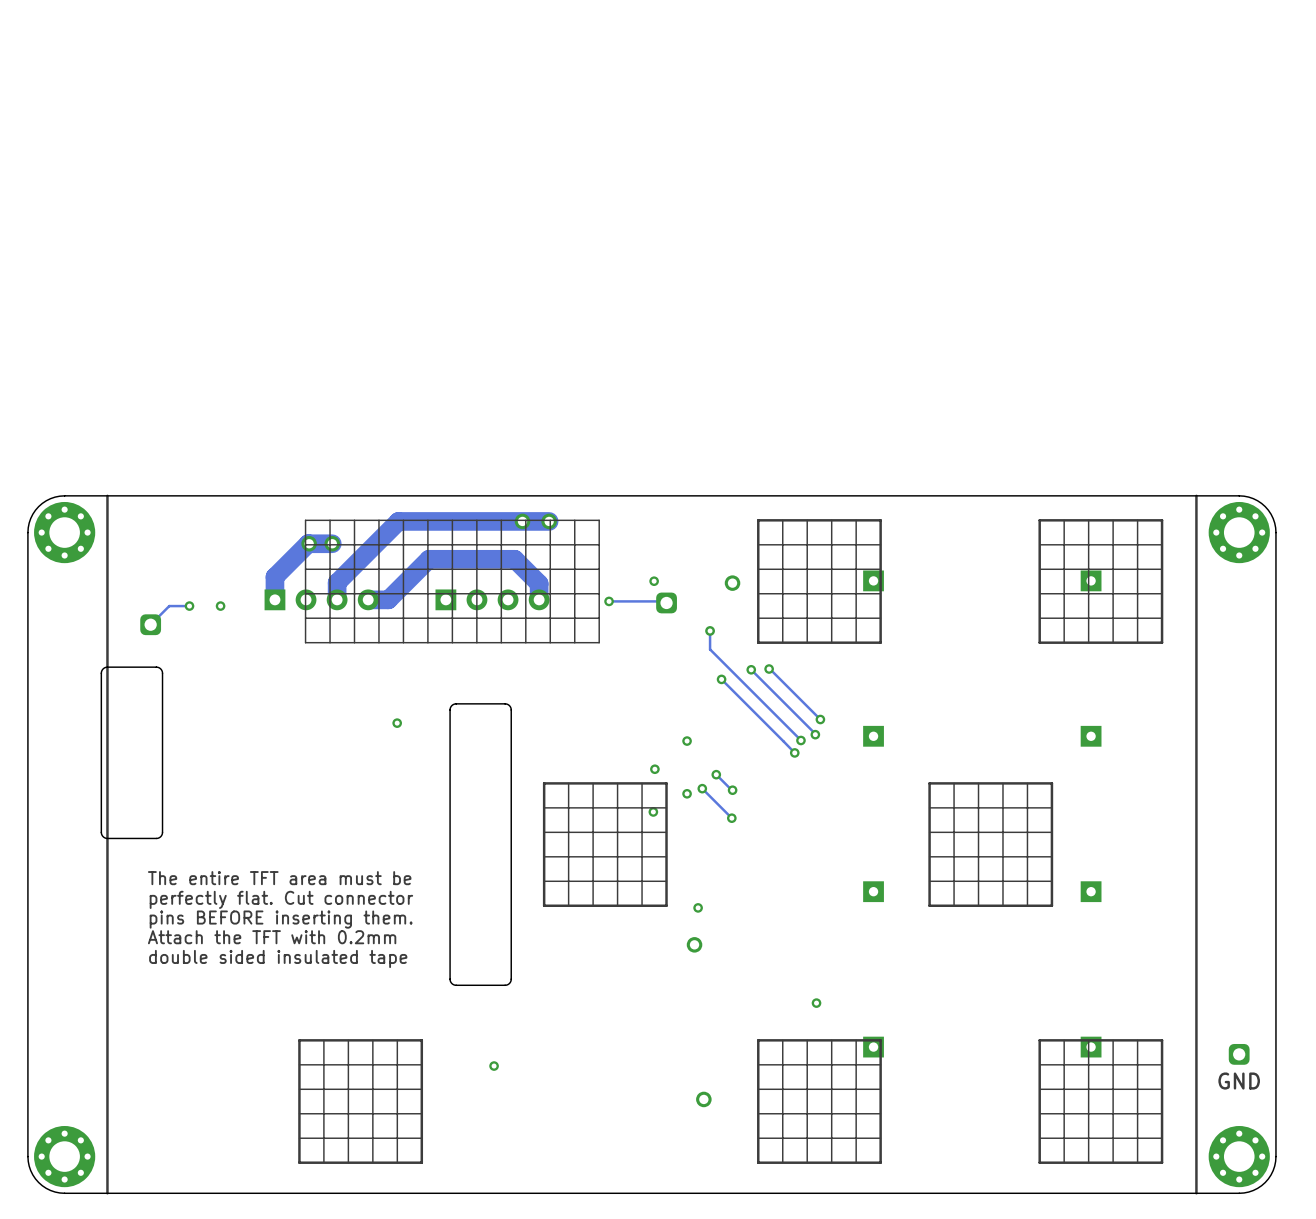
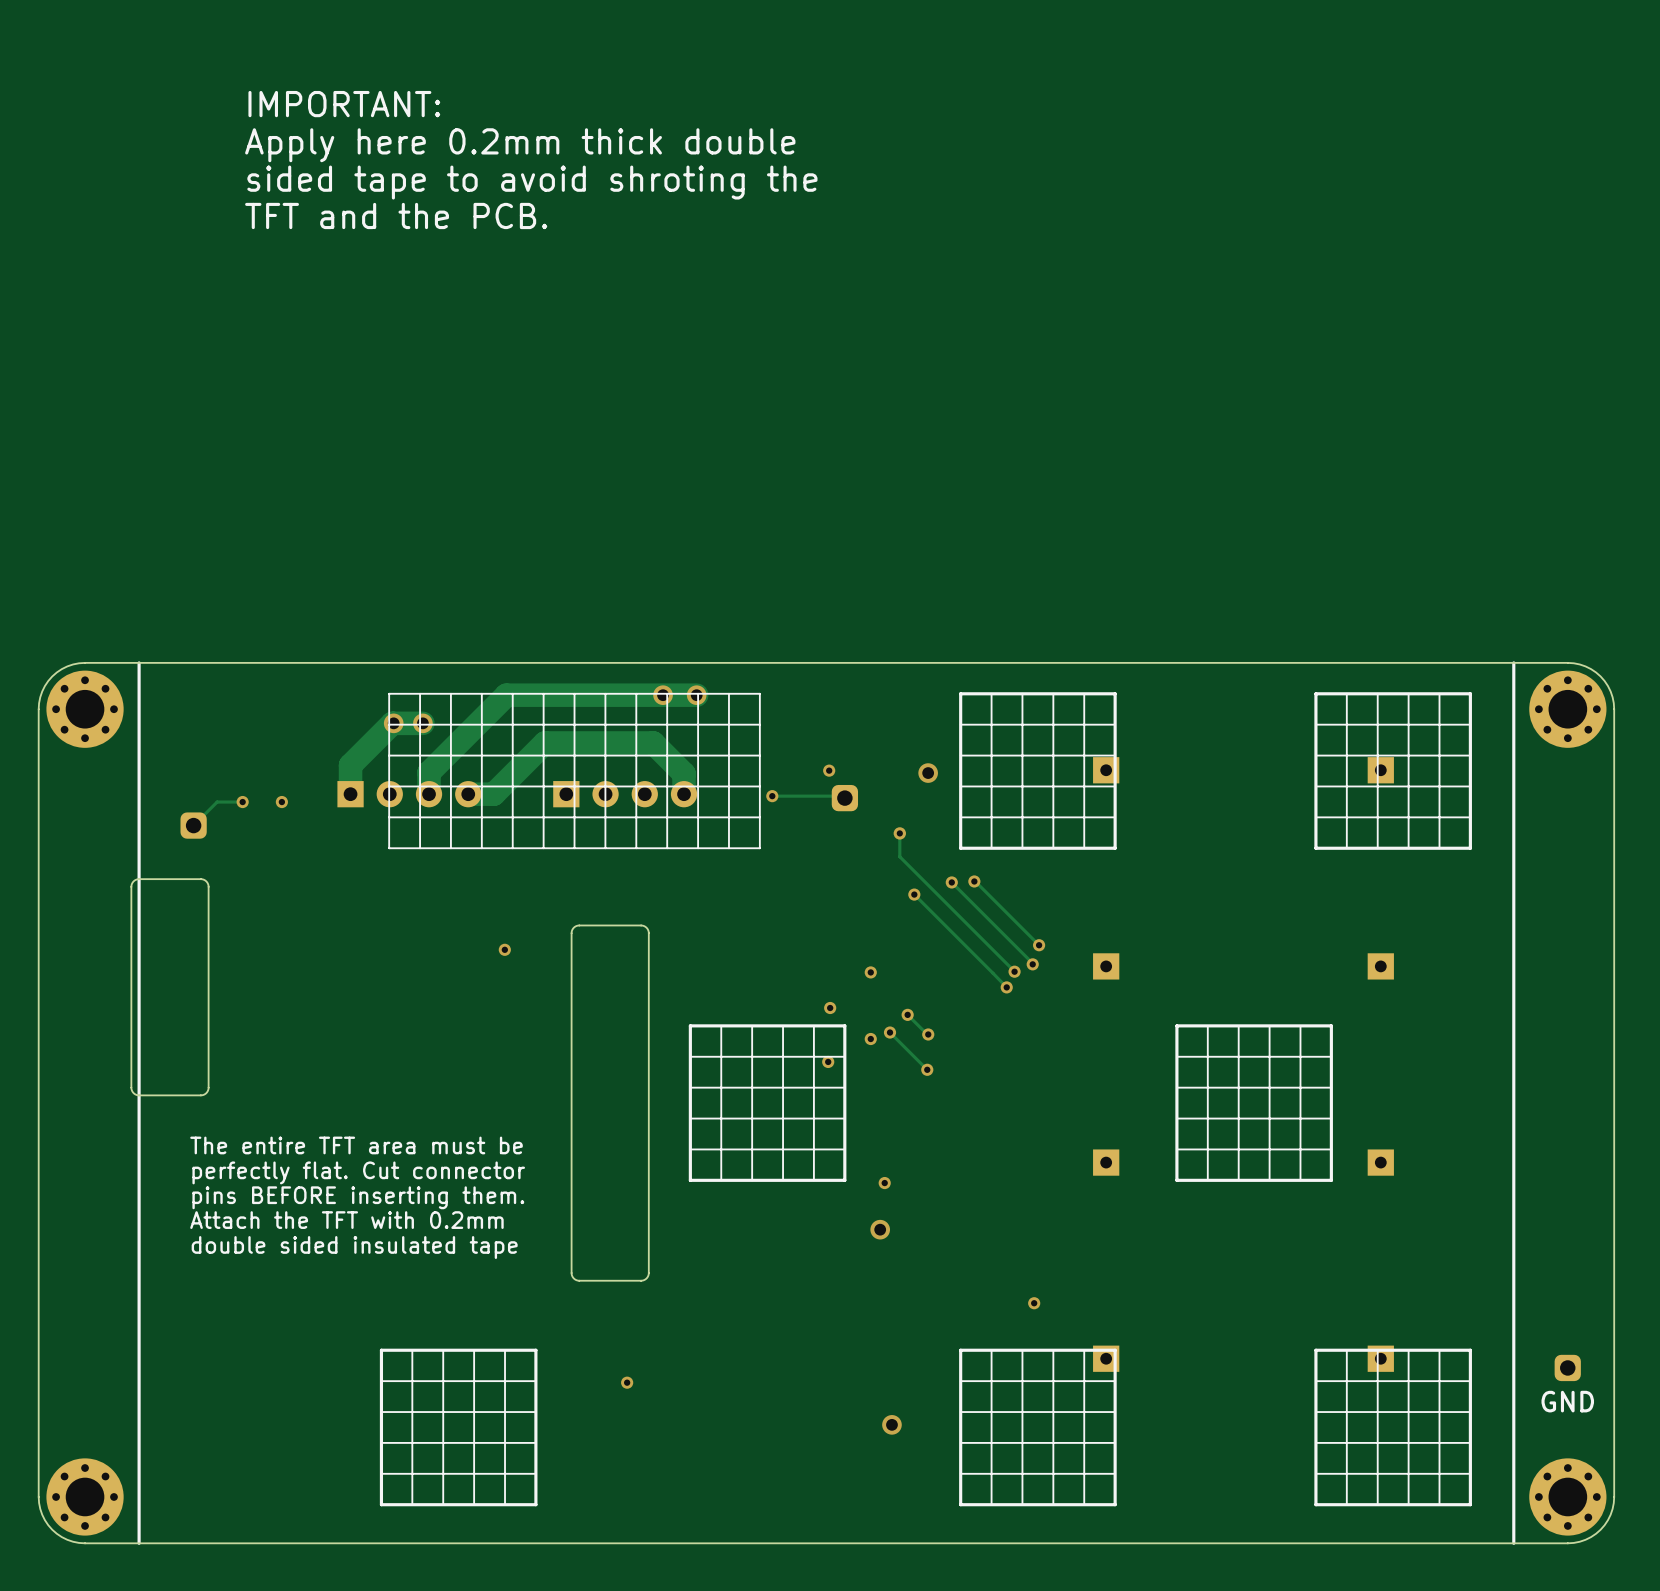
text: none -> IMPORTANT: (344, 104)
text: none -> Apply here 0.2mm thick double (520, 145)
text: none -> sided tape to avoid shroting the (532, 182)
text: none -> TFT and the PCB. (396, 215)

